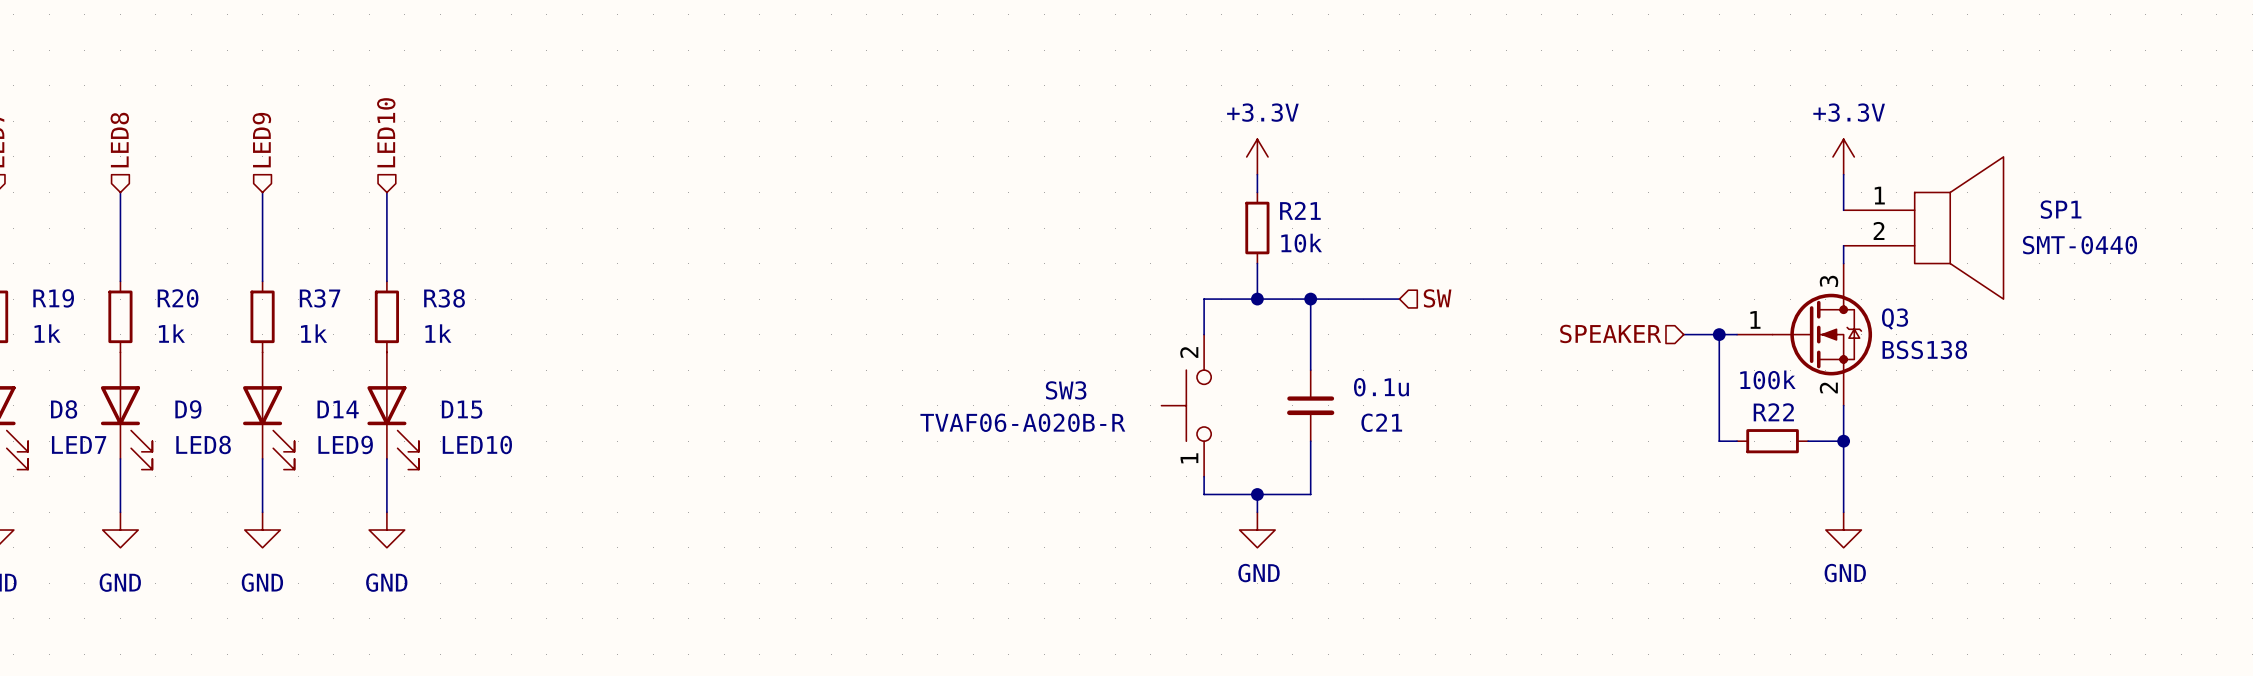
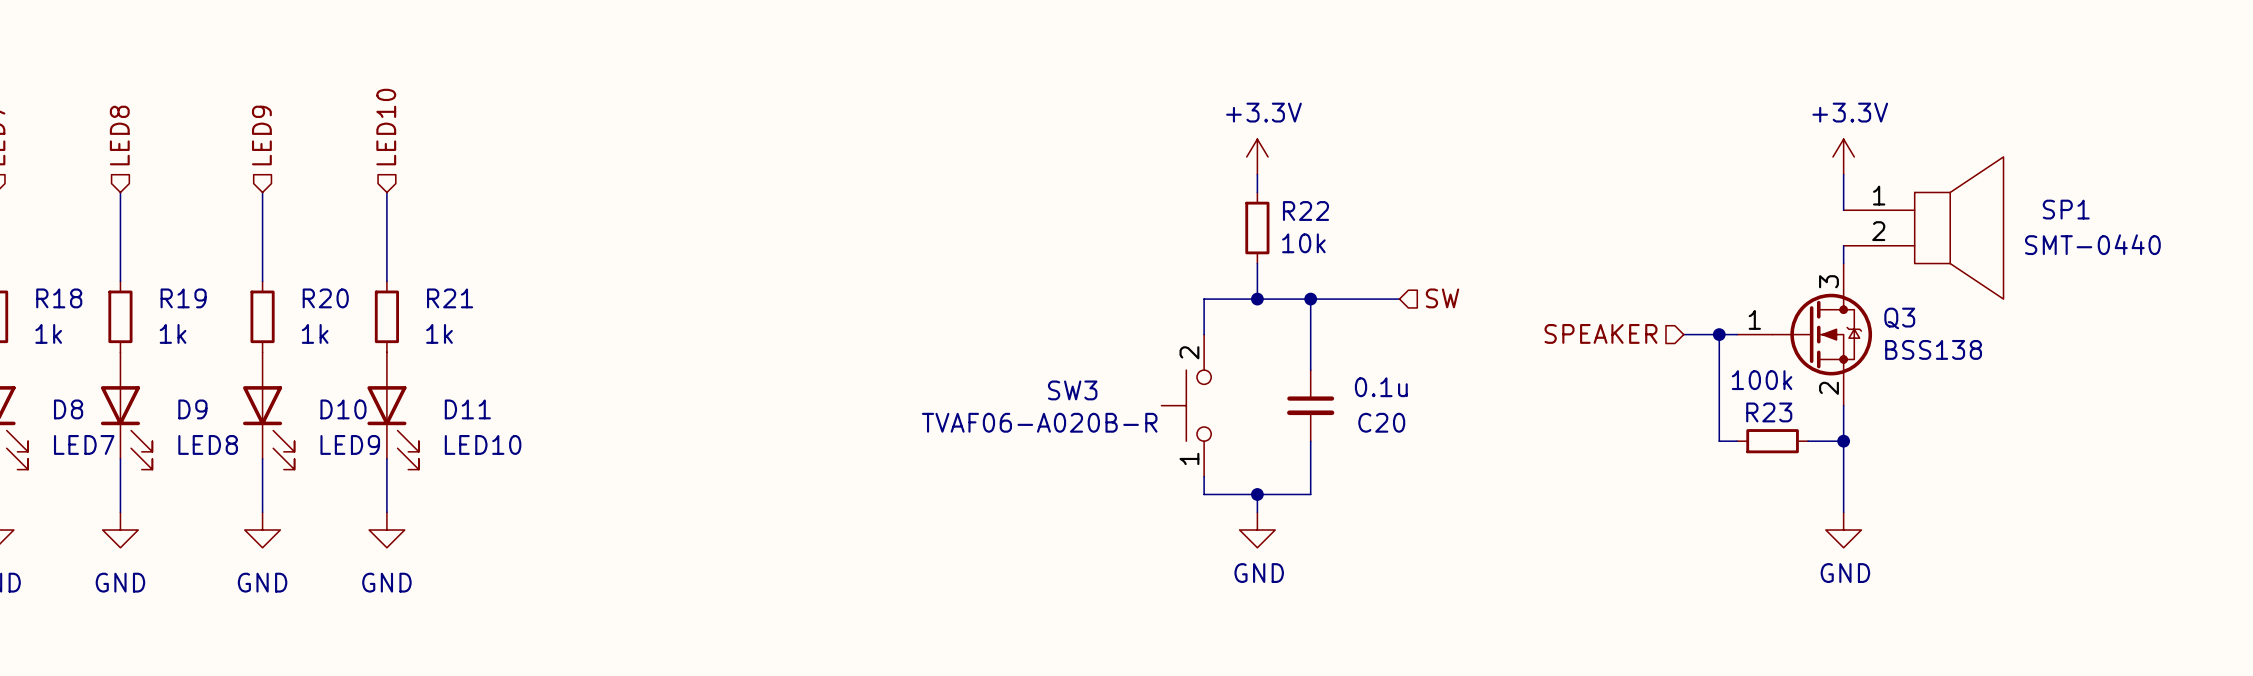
R21 name: R21 (1300, 210) -> R22 (1305, 211)
R19 name: R19 (53, 298) -> R18 (59, 298)
R20 name: R20 (178, 298) -> R19 (183, 298)
R37 name: R37 (320, 298) -> R20 (325, 298)
R38 name: R38 (444, 298) -> R21 (450, 298)
D14 name: D14 (338, 409) -> D10 (343, 409)
D15 name: D15 (462, 409) -> D11 (467, 409)
R22 name: R22 (1773, 412) -> R23 (1769, 412)
C21 name: C21 (1381, 422) -> C20 (1381, 422)

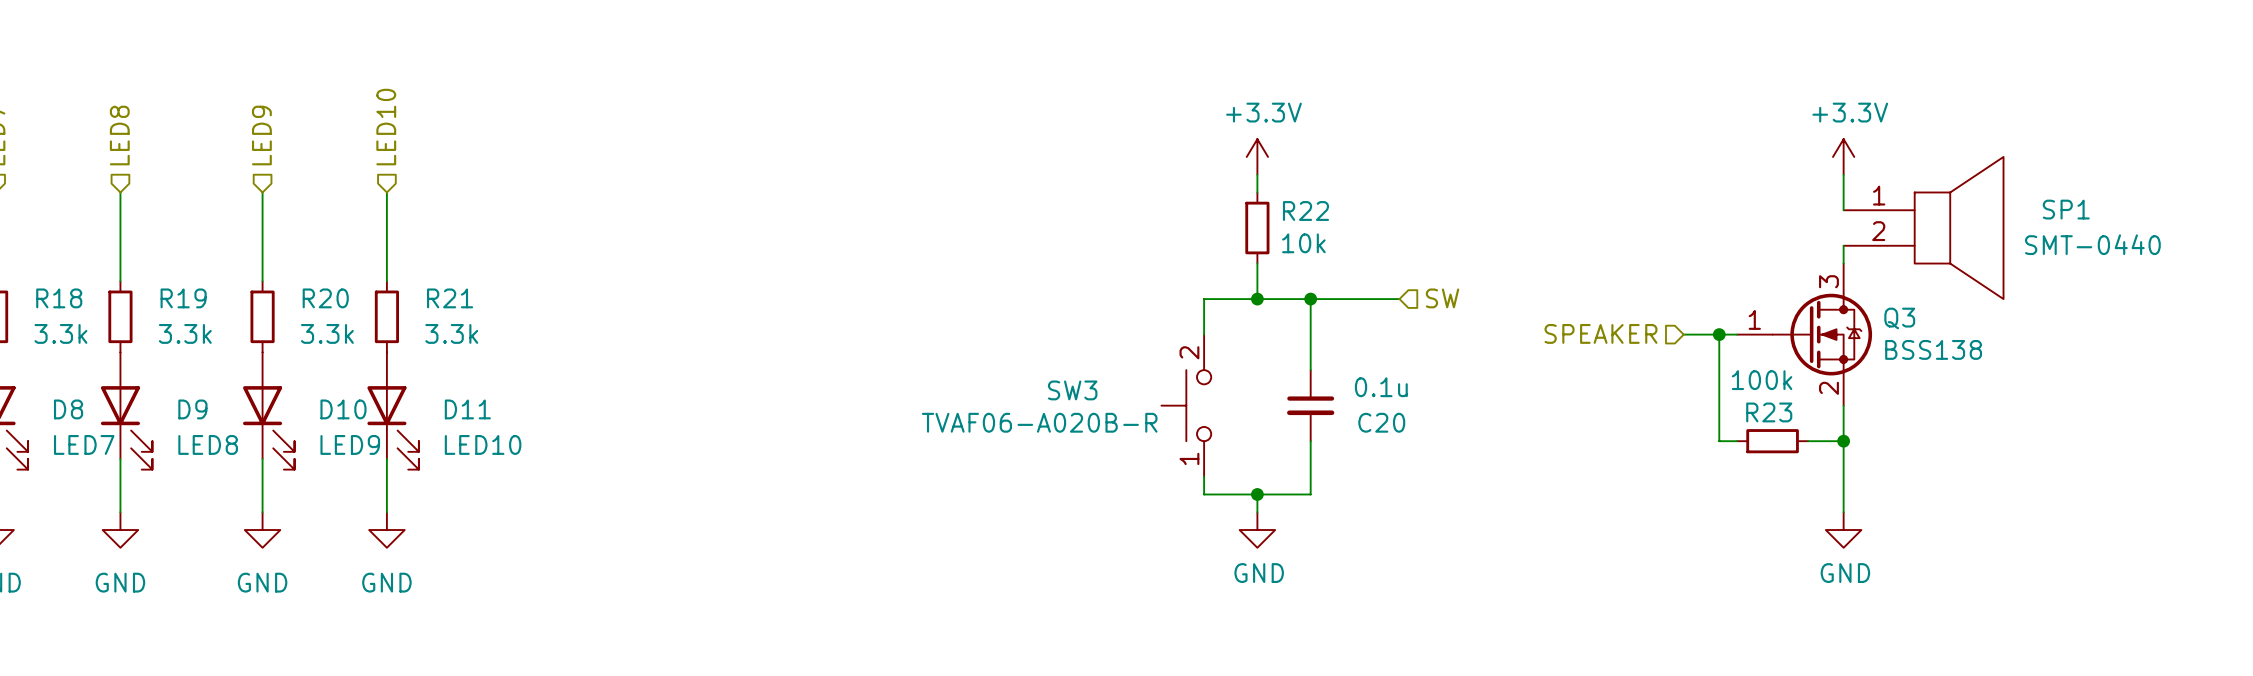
R18 value: 1k (48, 333) -> 3.3k (60, 333)
R19 value: 1k (173, 333) -> 3.3k (185, 333)
R20 value: 1k (315, 333) -> 3.3k (327, 333)
R21 value: 1k (439, 333) -> 3.3k (451, 333)

